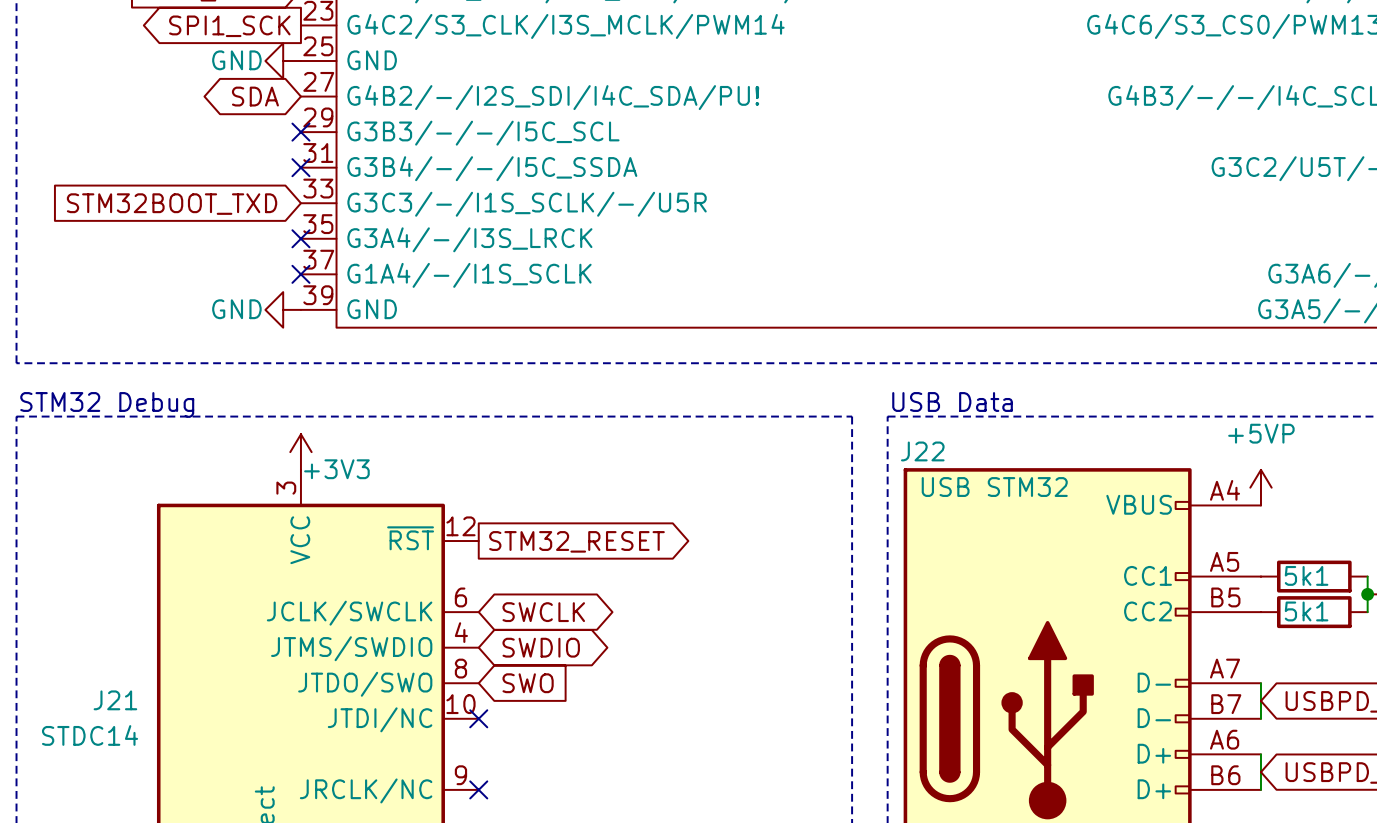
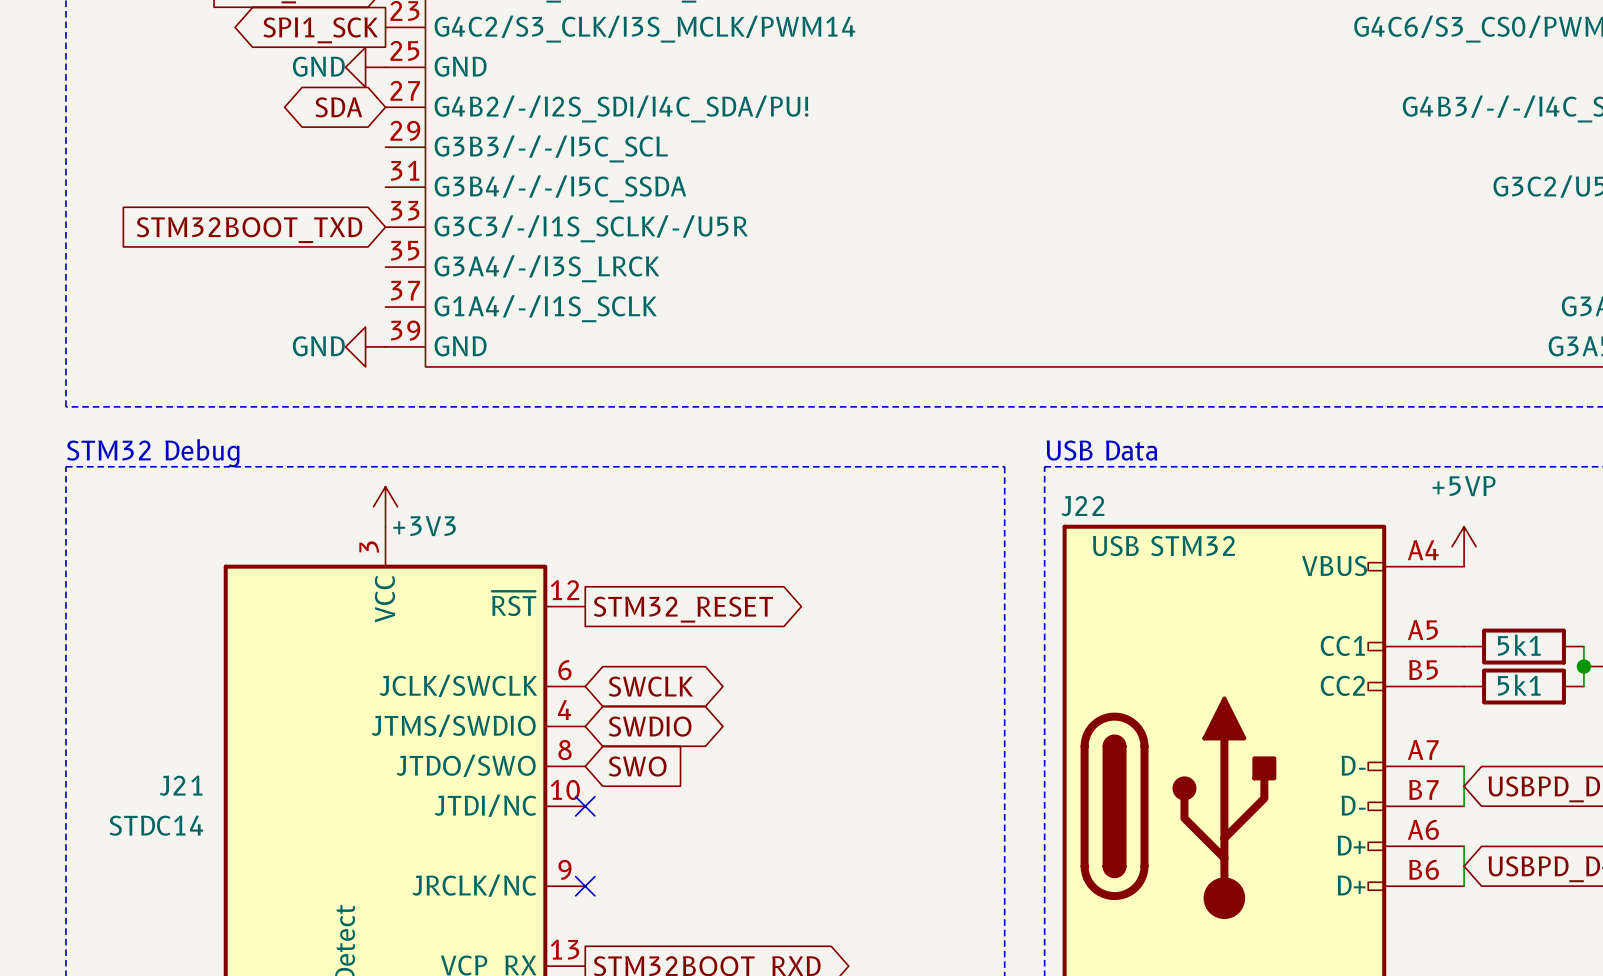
no-connect mark: (300, 132) -> none
no-connect mark: (300, 167) -> none
no-connect mark: (300, 238) -> none
no-connect mark: (300, 274) -> none

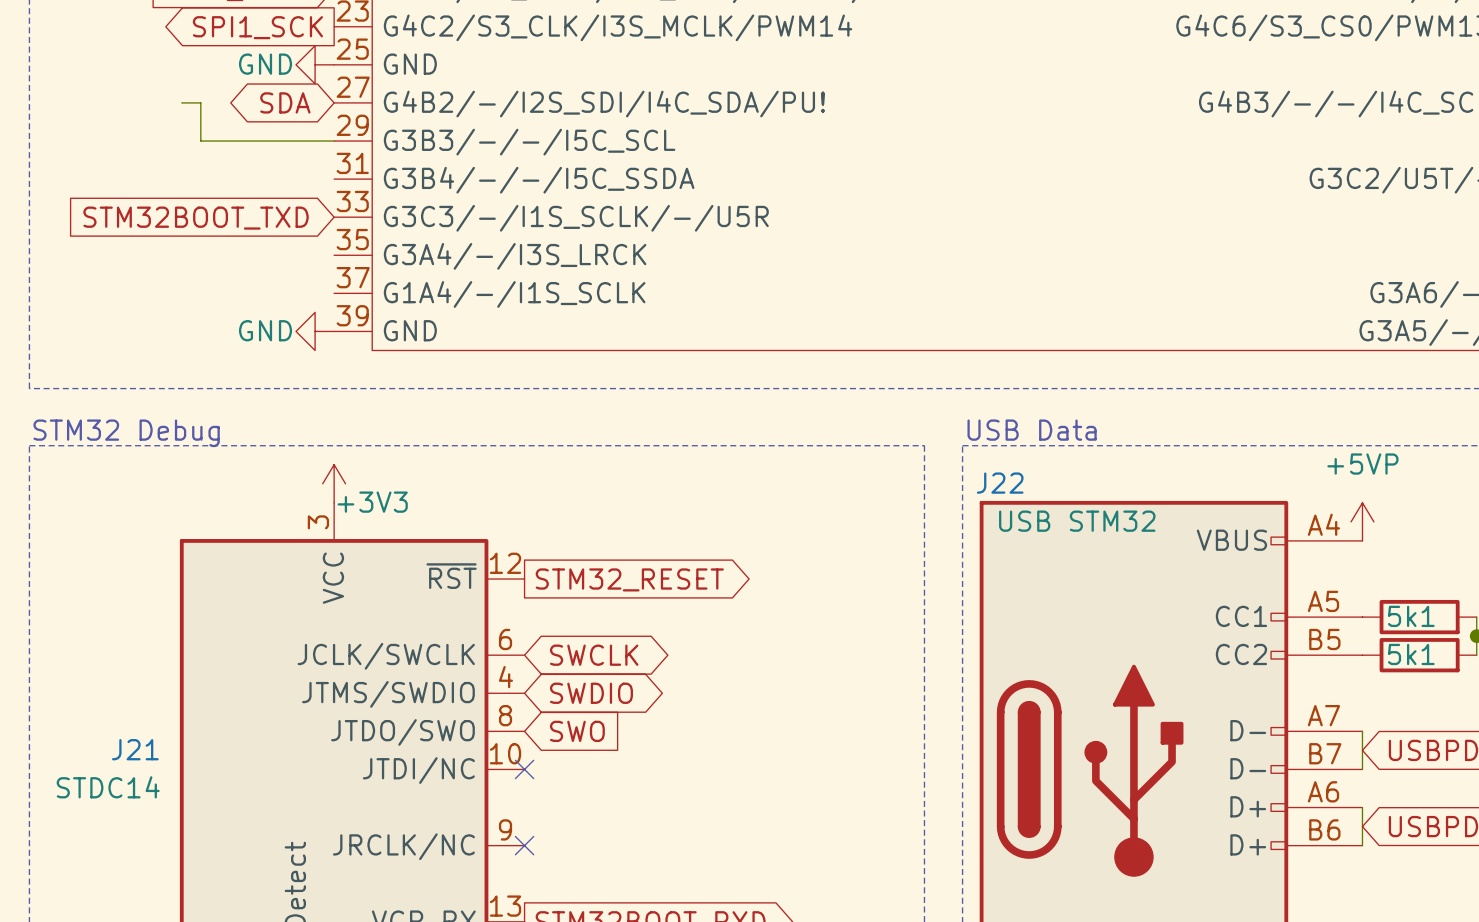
wire: none -> (181, 102) (200, 102) (200, 141) (334, 141)

